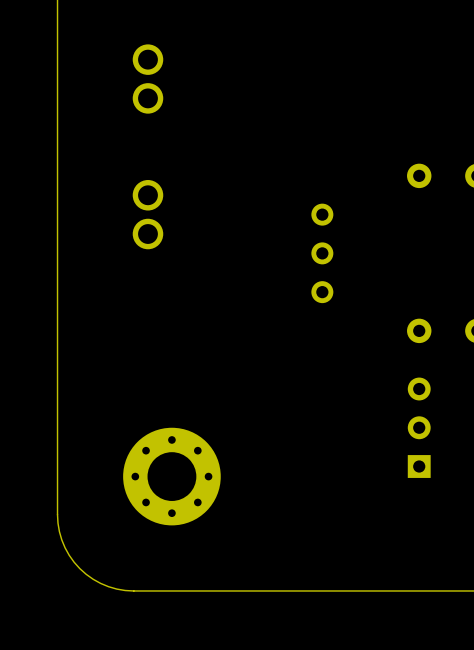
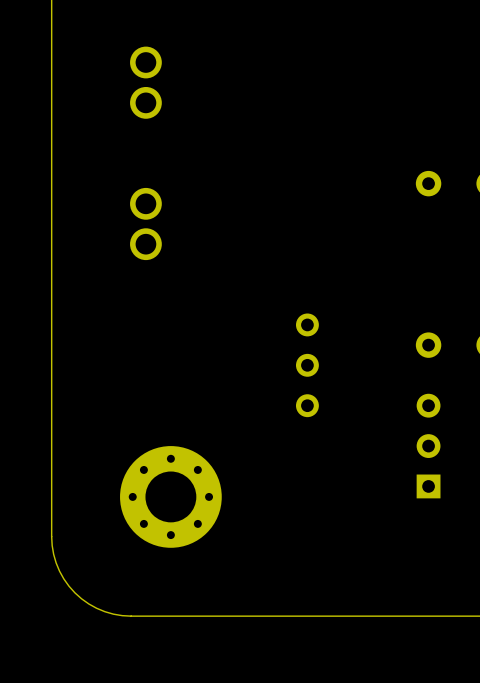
part position: (322, 253) -> (307, 365)

